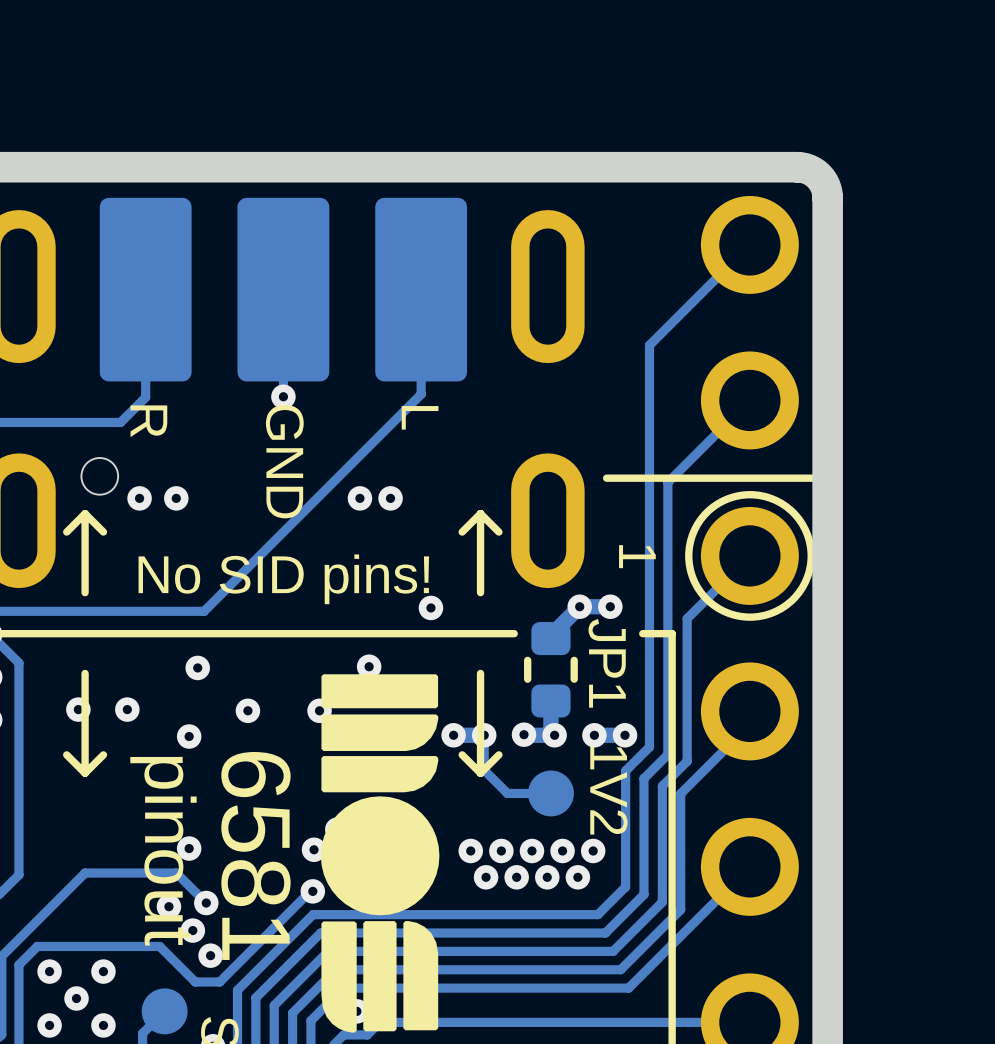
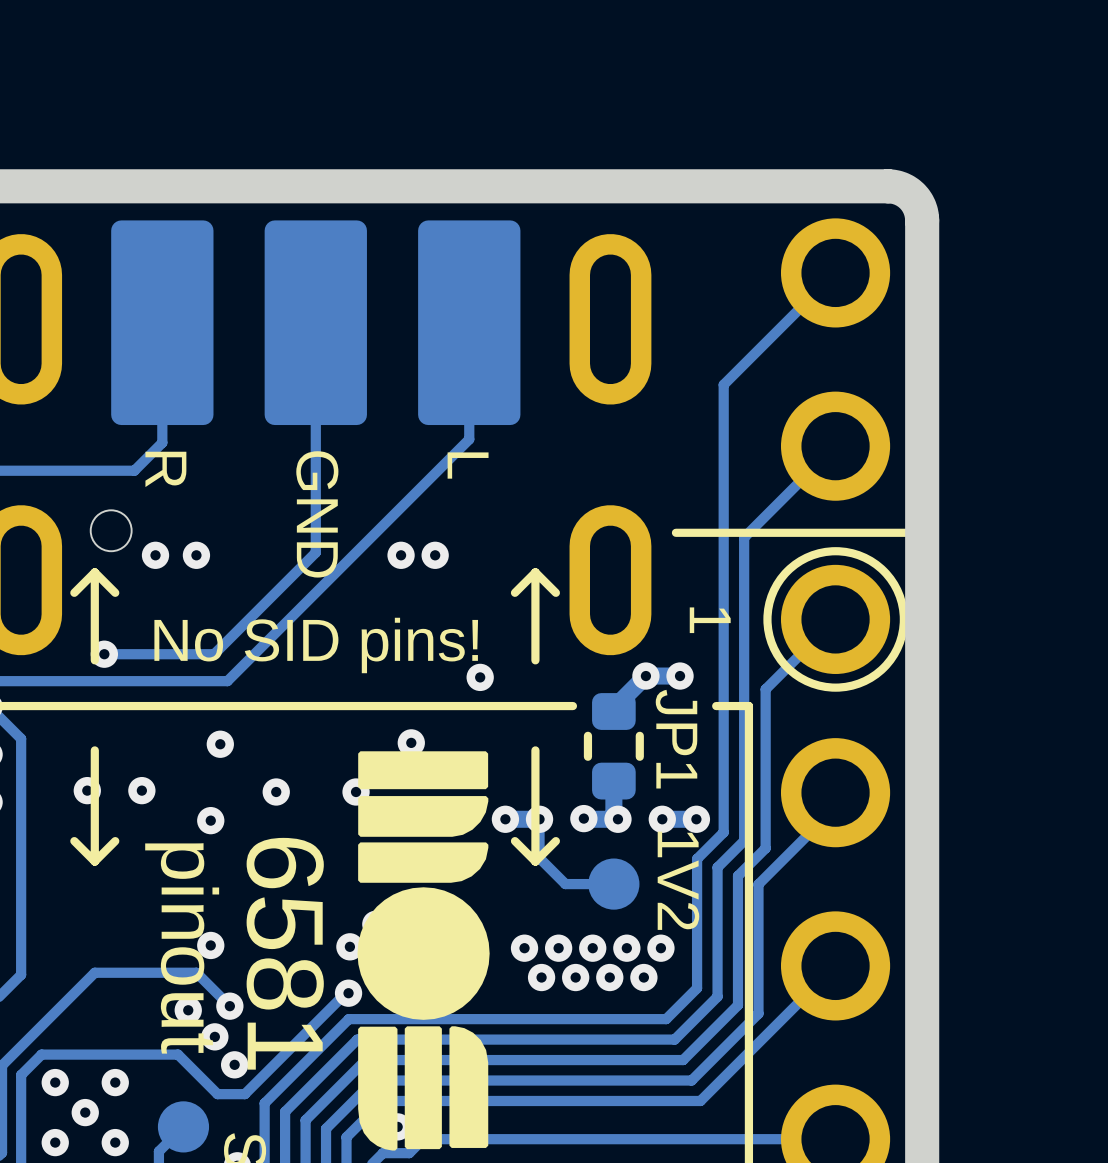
track: none -> (315, 442) (315, 552) (214, 654) (104, 654)
via position: (283, 396) -> (104, 654)

